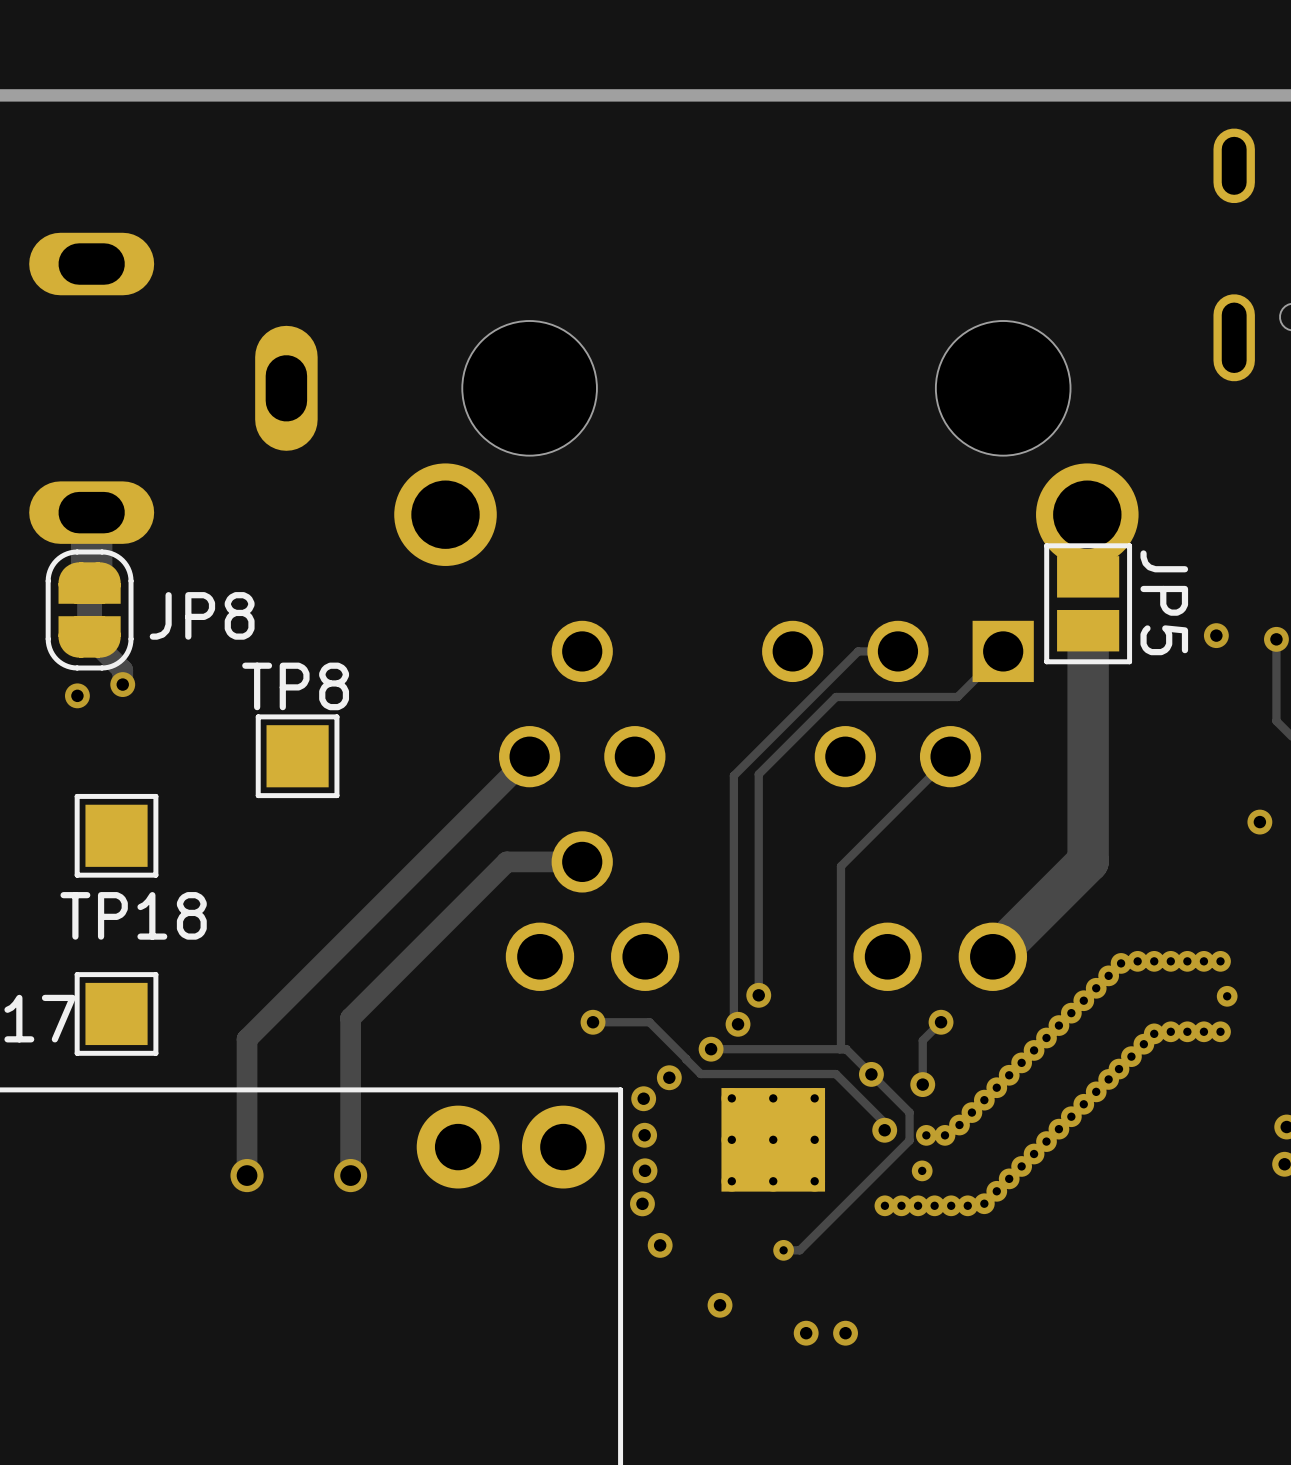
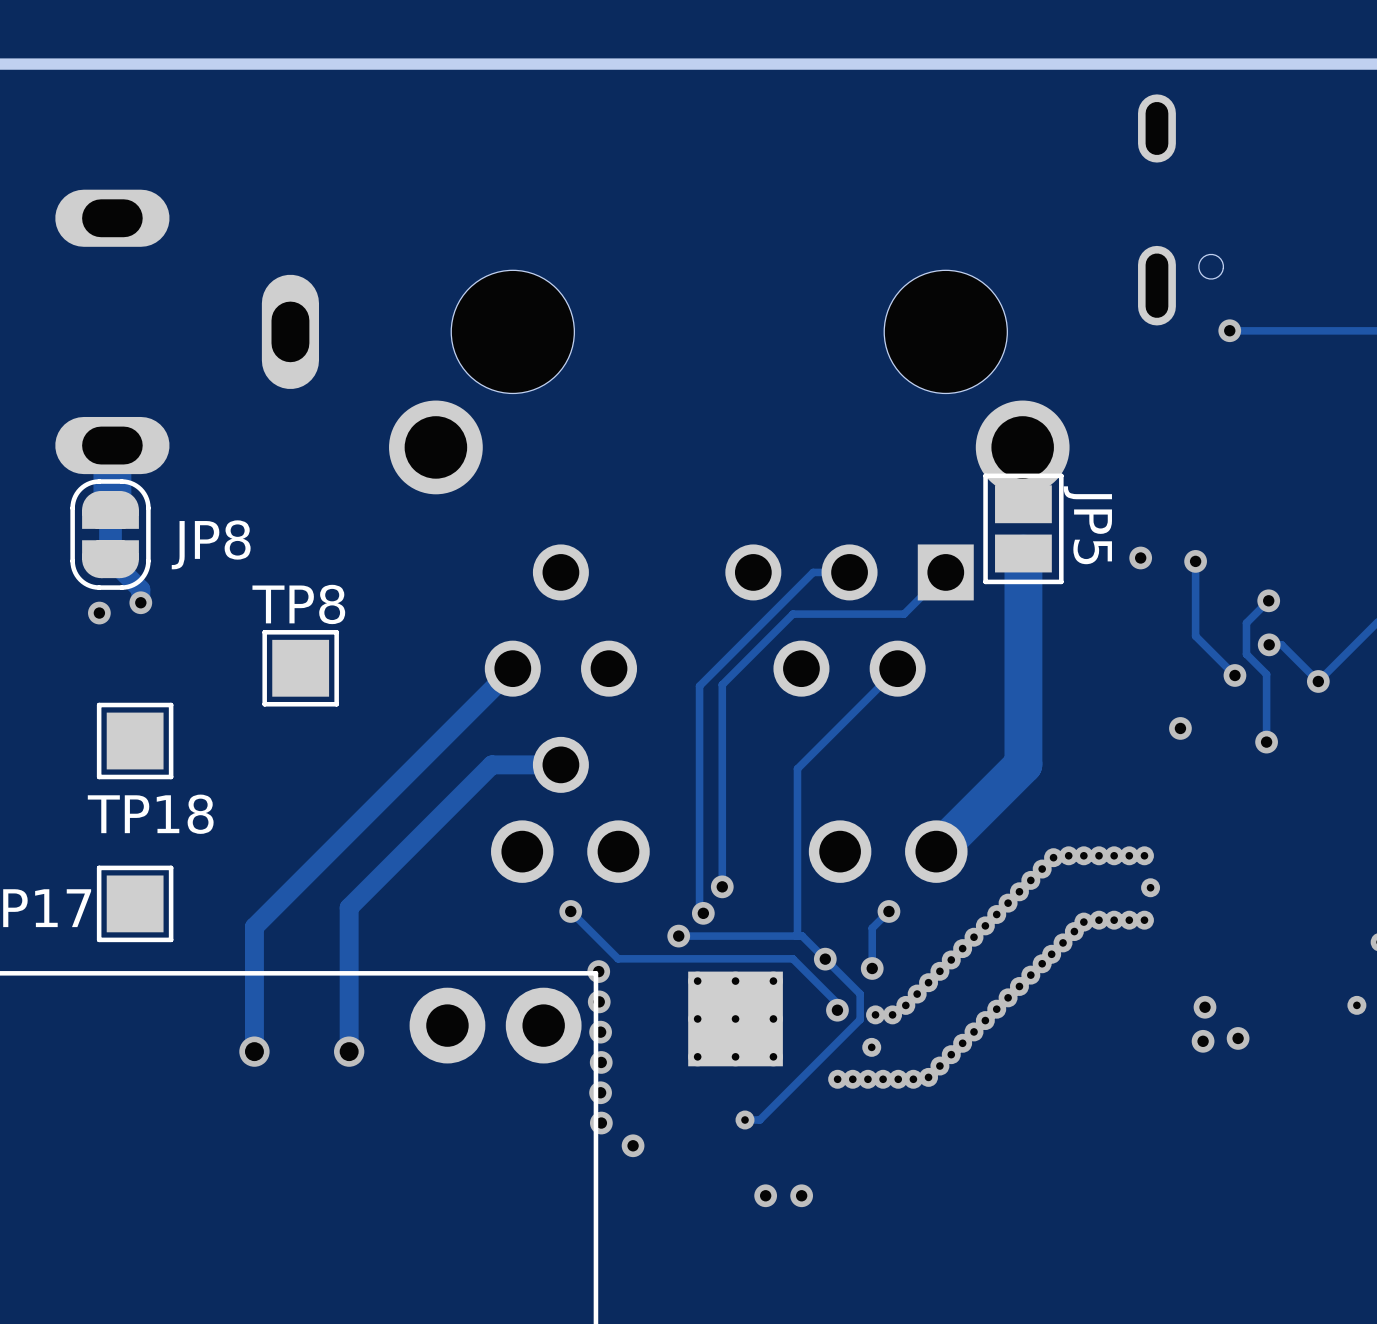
track: (593, 1022) (649, 1022) (686, 1058) -> (570, 911) (618, 958) (669, 958)
track: (686, 1059) (700, 1074) -> none
via: (669, 1077) -> none
via: none -> (598, 971)
via: (643, 1098) -> none
via: none -> (599, 1001)
via: (644, 1135) -> none
via: none -> (600, 1032)
via: (645, 1170) -> none
via: none -> (601, 1062)
via: (642, 1203) -> none
via: none -> (600, 1092)
via: (660, 1245) -> none
via: none -> (601, 1123)
via: none -> (633, 1145)
via: (720, 1305) -> none

